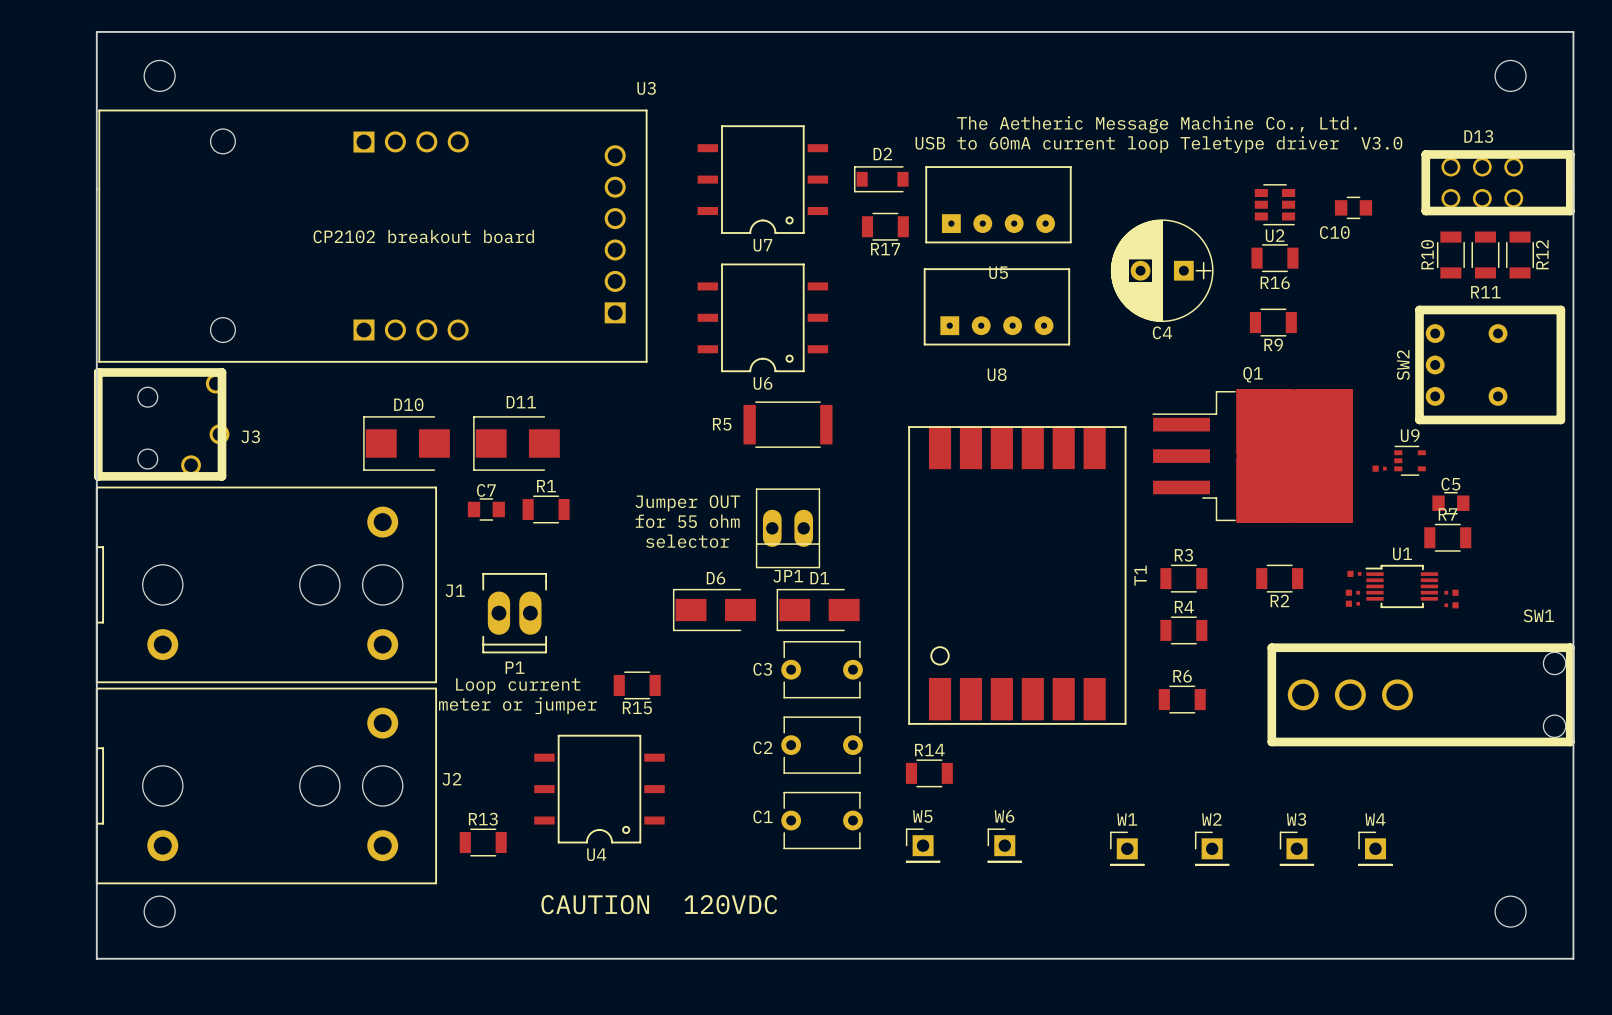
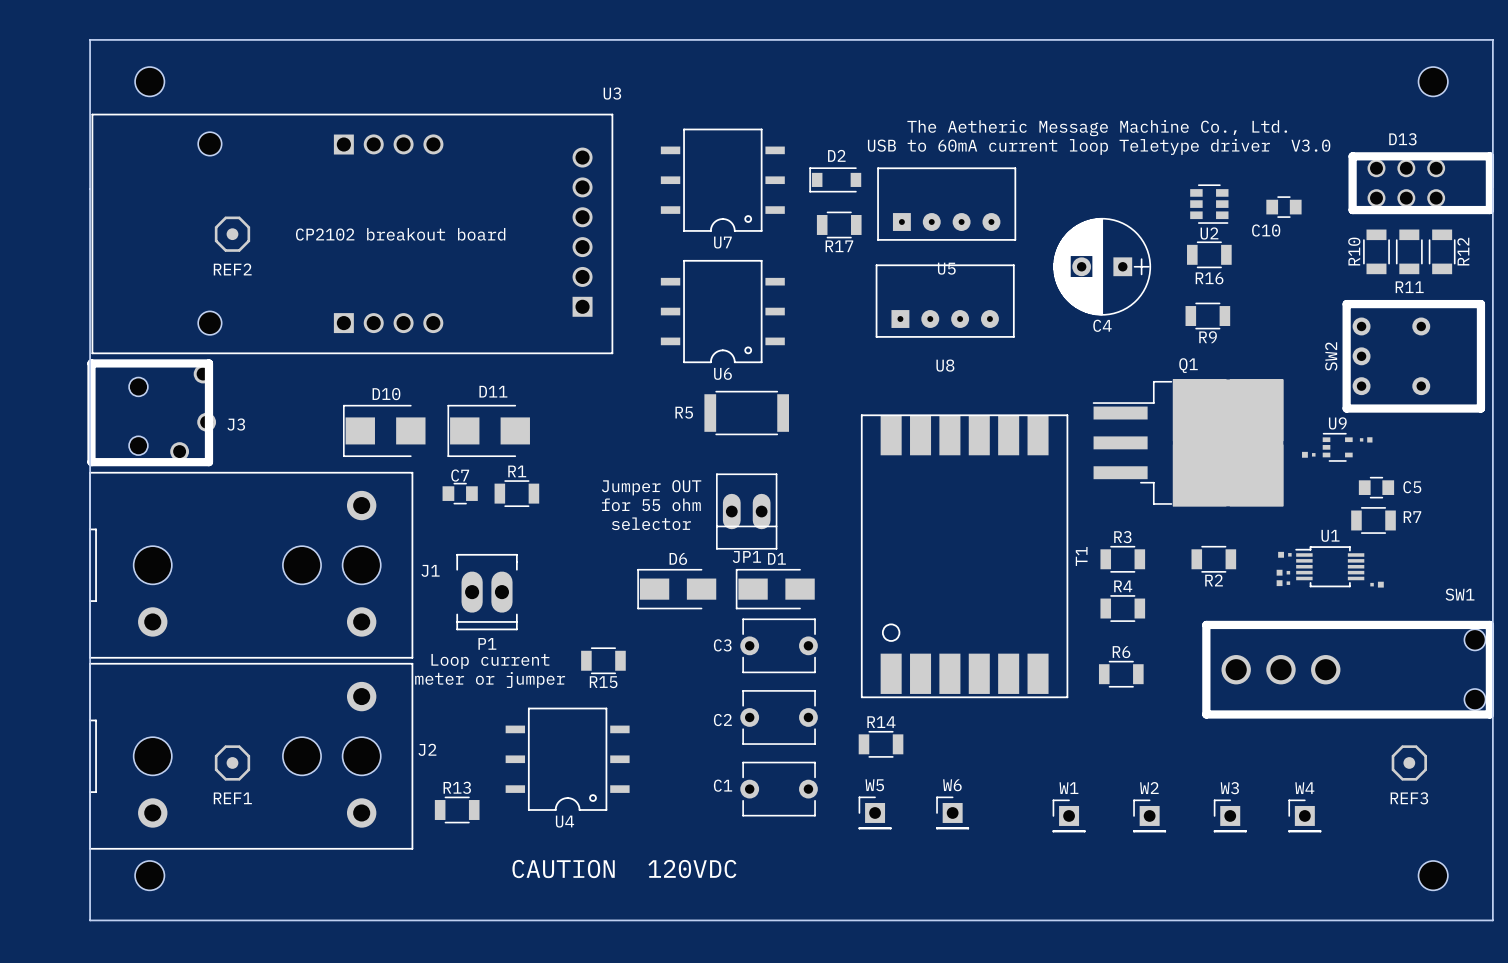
REF2: none -> (232, 234)
part: none -> (1366, 439)
C5 name position: C5 (1450, 484) -> C5 (1412, 487)
R7 name position: R7 (1447, 514) -> R7 (1412, 517)
part: (1451, 592) -> none
REF1: none -> (232, 762)
REF3: none -> (1409, 762)

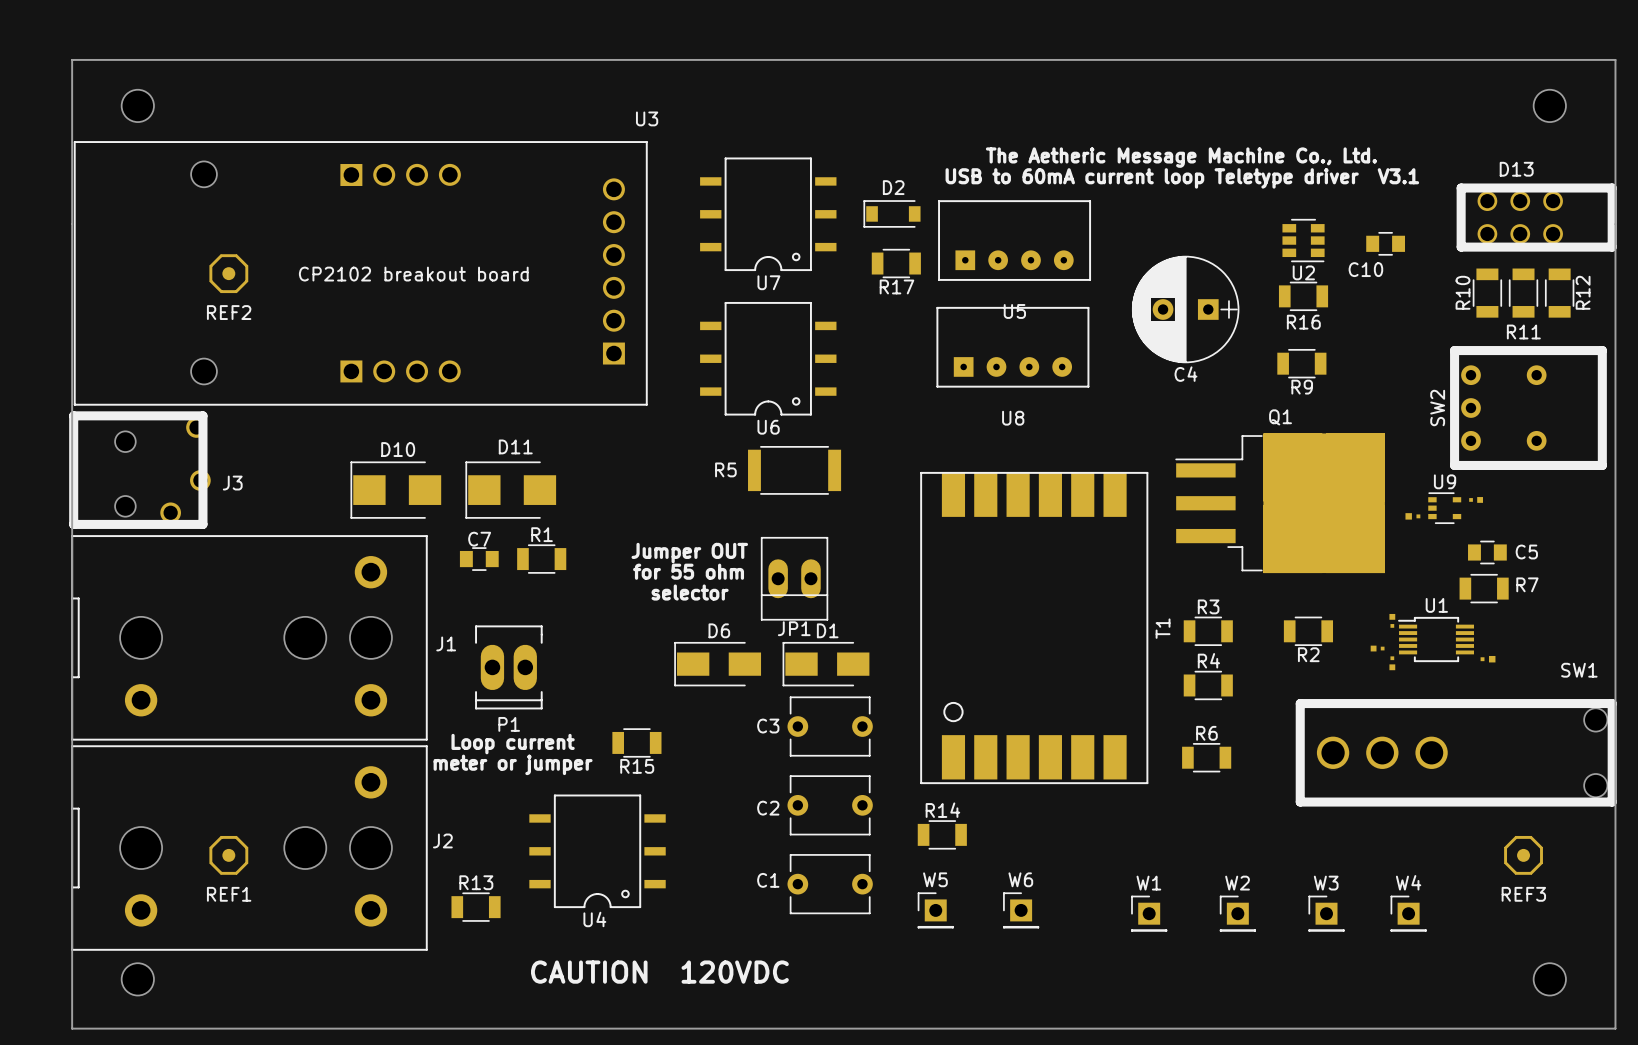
text: USB to 60mA current loop Teletype driver V3.0 (1099, 146) -> USB to 60mA current loop Teletype driver V3.1 (1182, 178)
part footprint: [1278, 551, 1292, 558] -> [1389, 613, 1396, 628]
part: (1283, 572) -> none
part: none -> (1377, 648)
part: (1283, 583) -> none
part: none -> (1392, 663)

